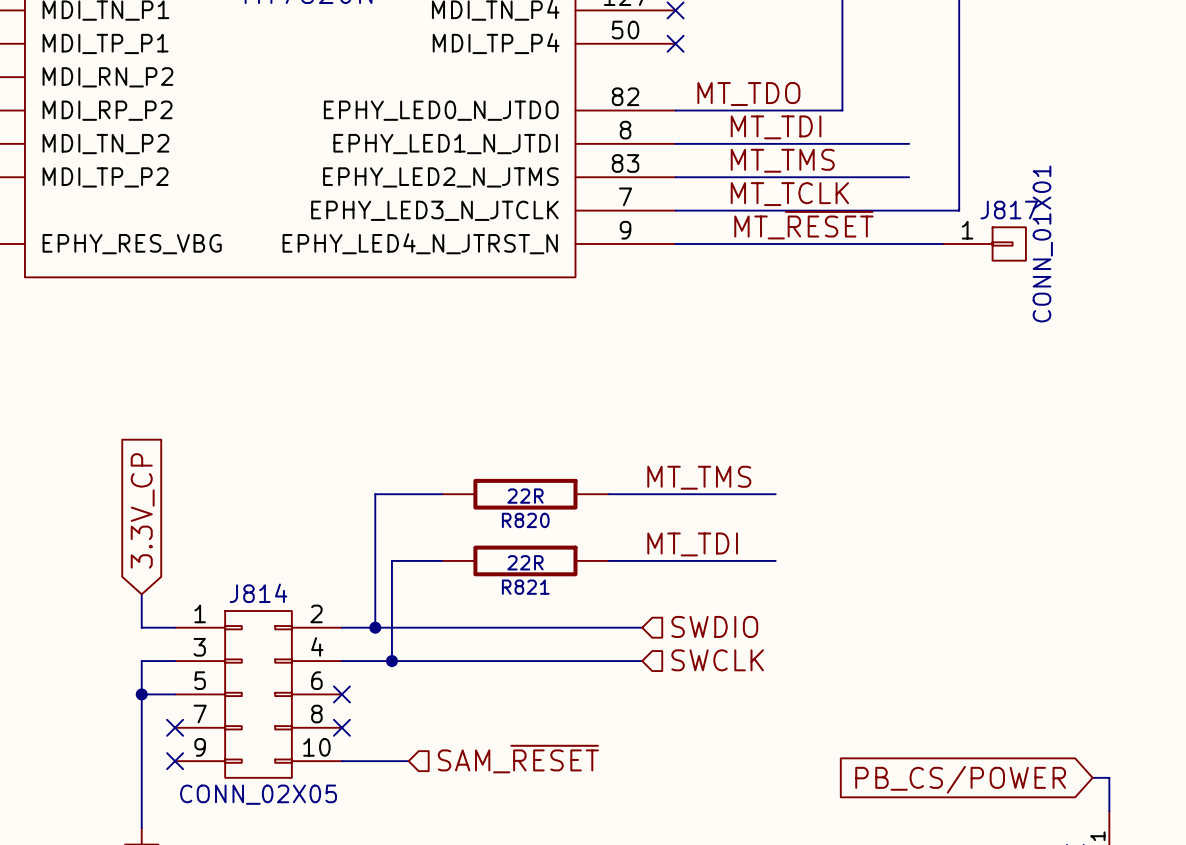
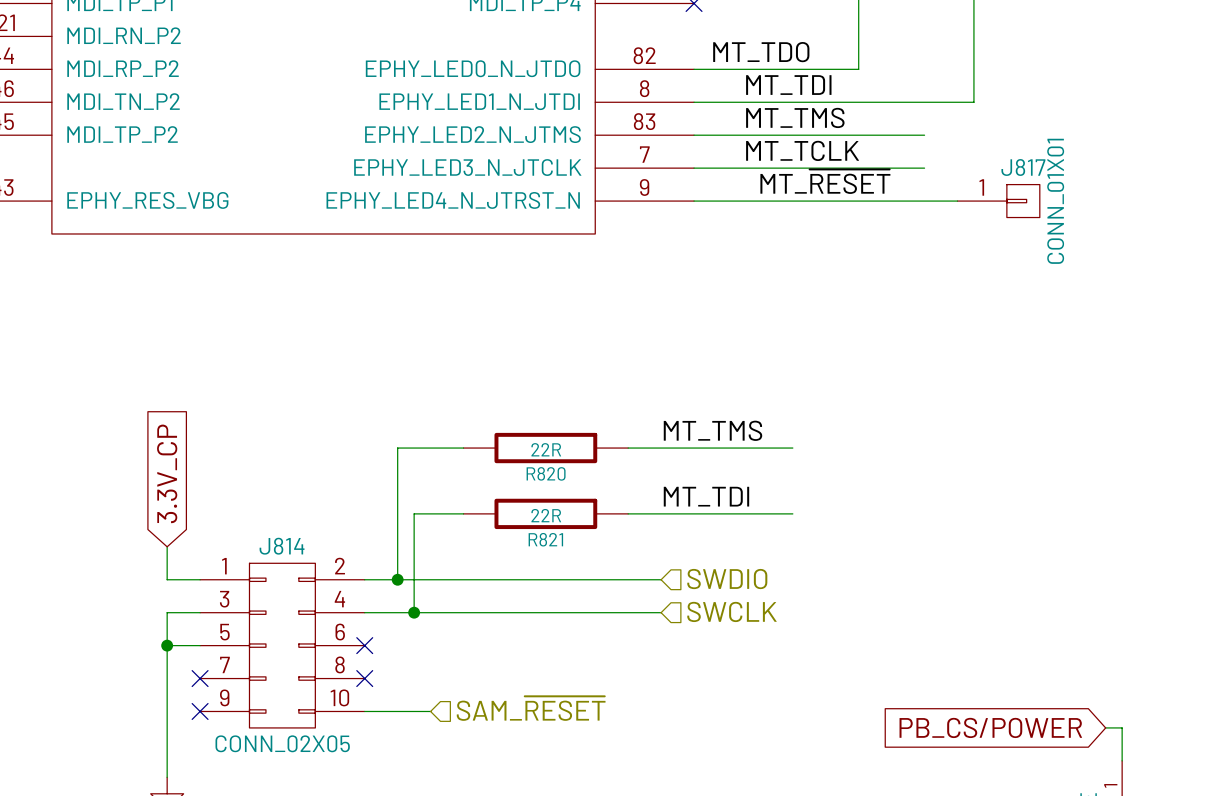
wire: (959, 143) (959, 210) (909, 210) -> (973, 102) (924, 102)

